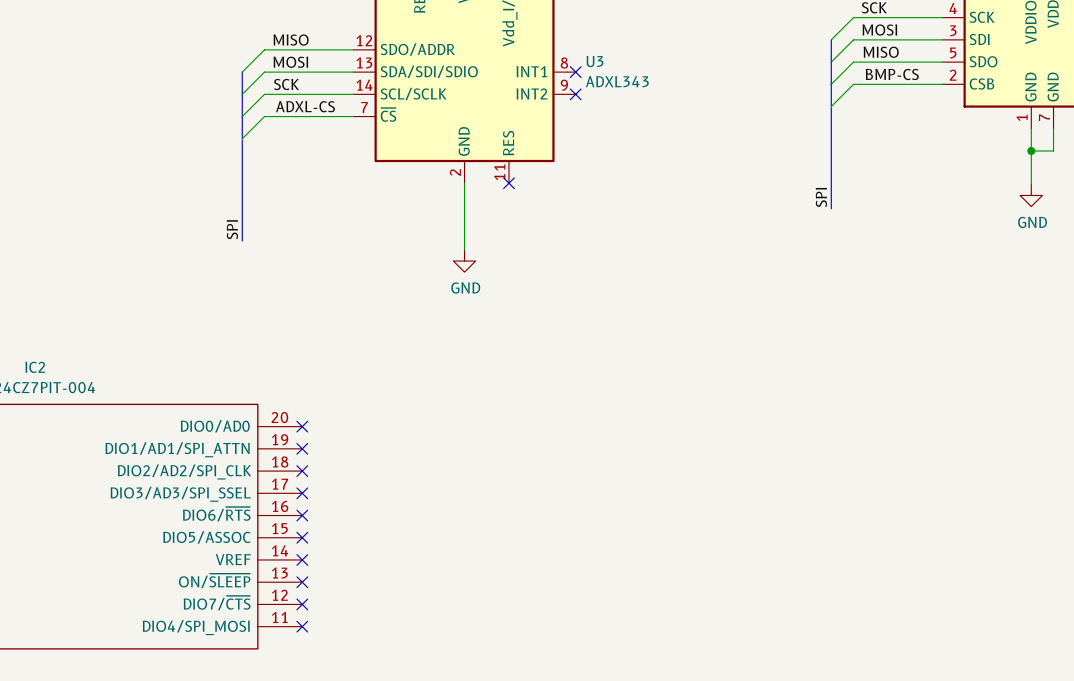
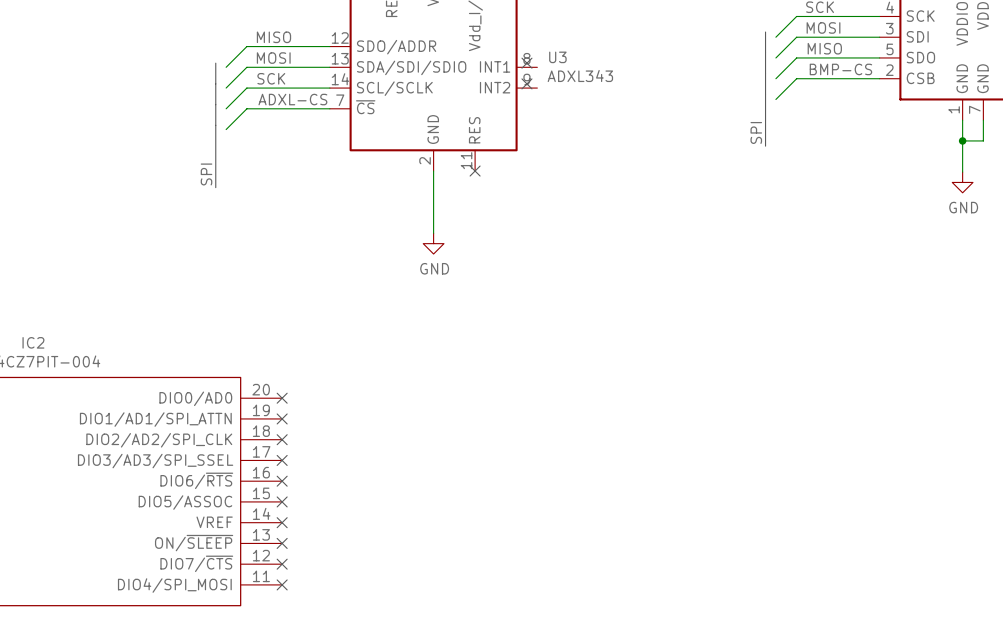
bus: none -> (765, 32) (765, 146)
bus: (831, 39) (831, 106) -> none
bus: none -> (215, 63) (215, 187)
no-connect mark: none -> (526, 63)
bus: (242, 72) (242, 138) -> none
no-connect mark: (575, 72) -> none
no-connect mark: none -> (526, 83)
no-connect mark: (575, 94) -> none
bus: (831, 107) (831, 208) -> none
bus: (242, 139) (242, 241) -> none
label position: SPI (821, 197) -> SPI (756, 132)
label position: SPI (232, 229) -> SPI (206, 174)

